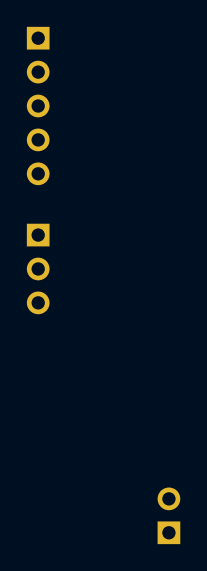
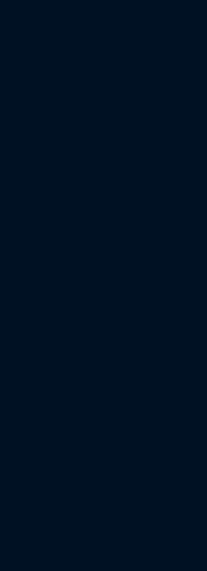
part: (38, 106) -> none
part: (38, 268) -> none
part: (168, 515) -> none

